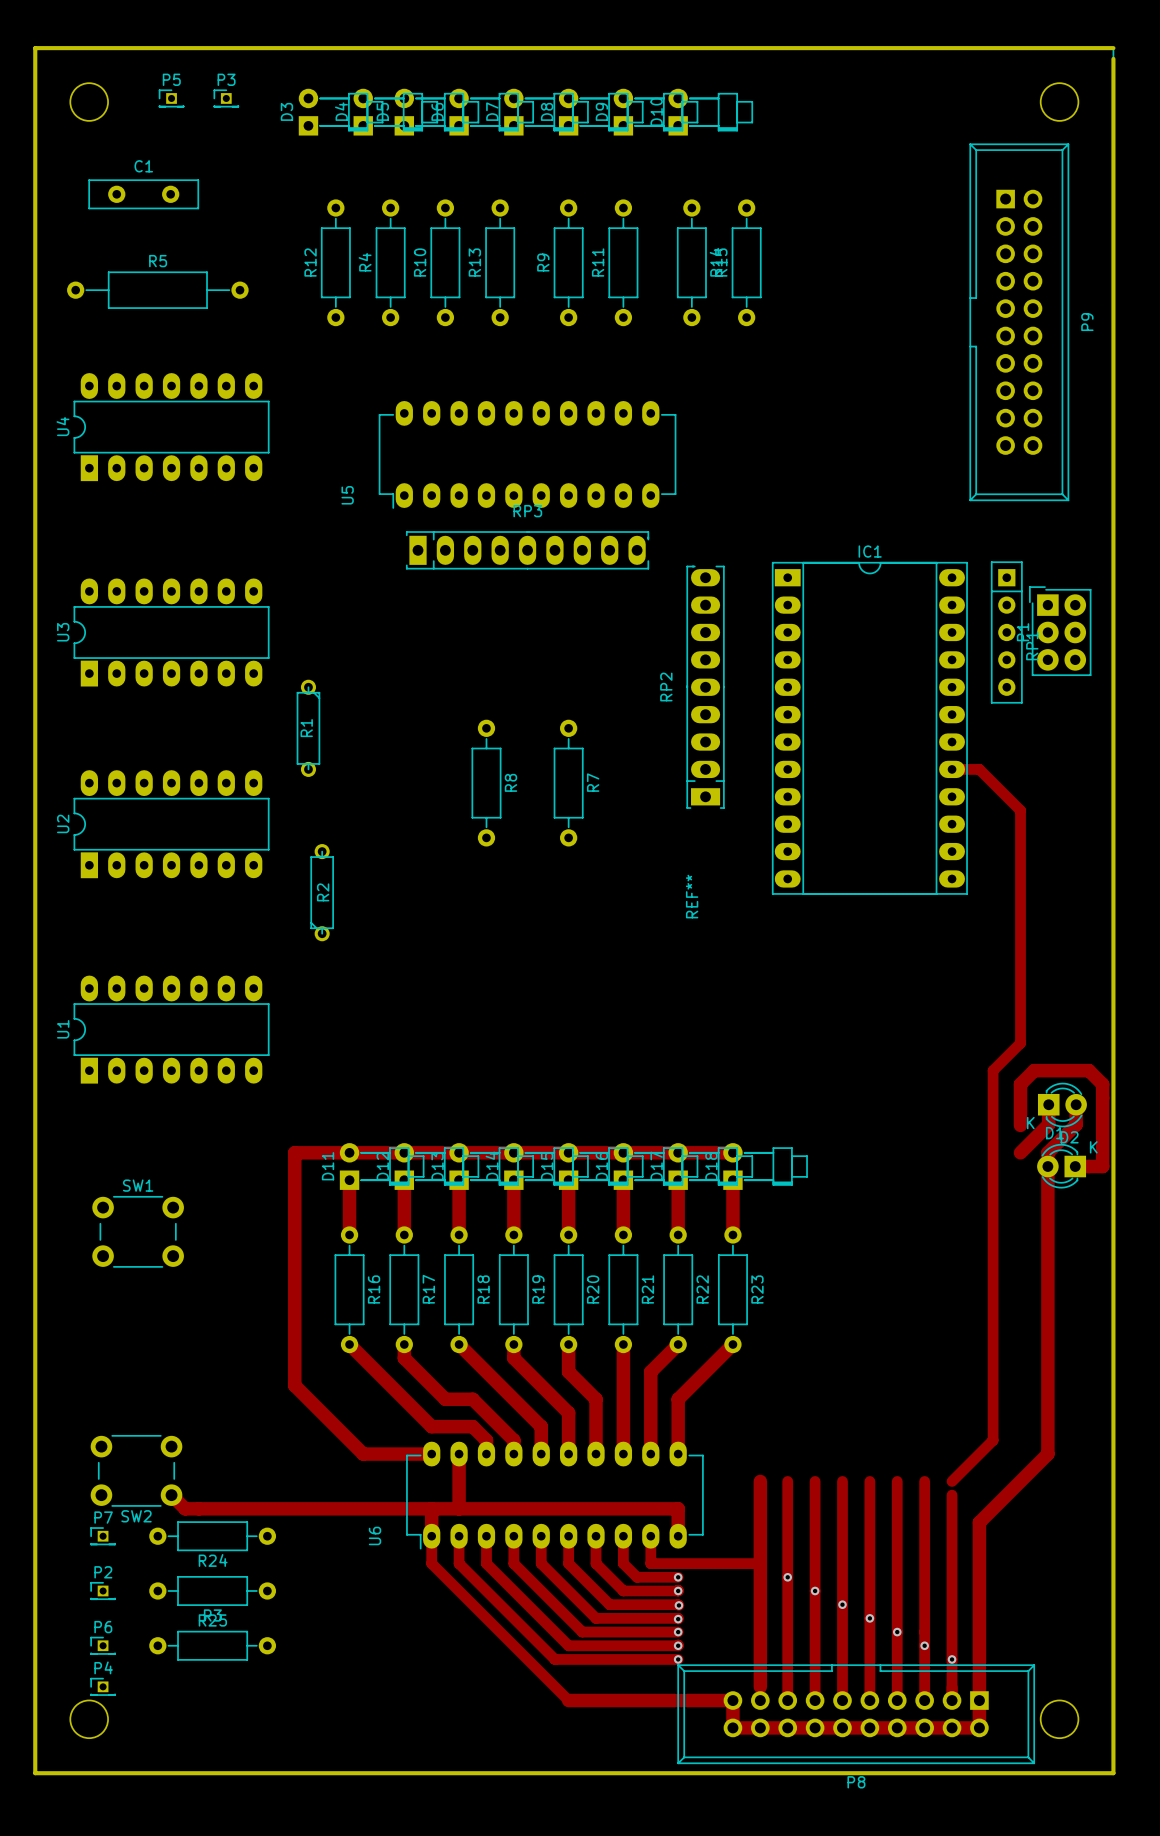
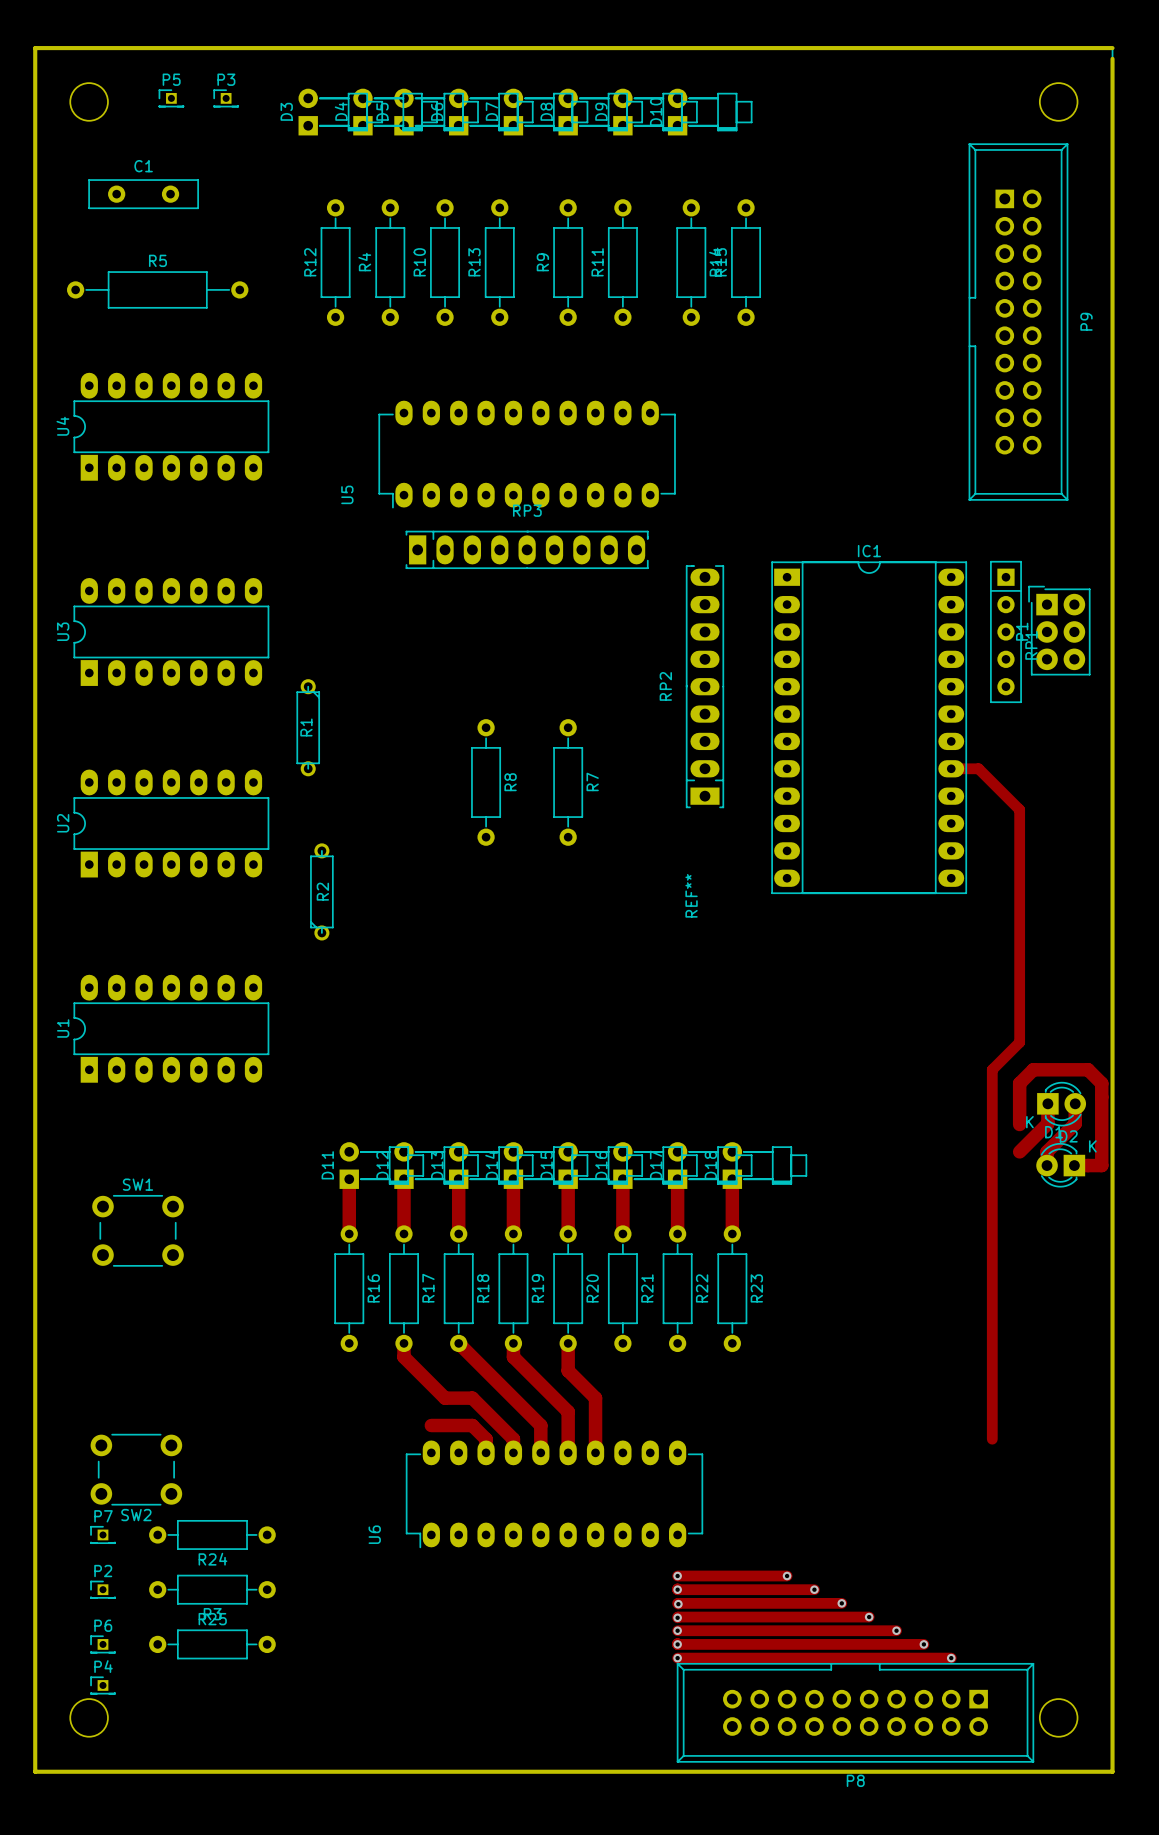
track: (732, 1152) (294, 1152) (294, 1385) (363, 1454) (431, 1454) -> none
track: (1047, 1166) (1047, 1454) (979, 1522) (979, 1727) (732, 1727) (732, 1700) (568, 1700) (431, 1563) (431, 1508) -> none
track: (349, 1344) (431, 1426) -> none
track: (623, 1344) (623, 1454) -> none
track: (678, 1344) (650, 1371) (650, 1454) -> none
track: (732, 1344) (678, 1399) (678, 1454) -> none
track: (993, 1440) (952, 1481) -> none
track: (459, 1454) (459, 1508) -> none
track: (760, 1481) (760, 1686) -> none
track: (787, 1481) (787, 1700) -> none
track: (815, 1481) (815, 1700) -> none
track: (842, 1481) (842, 1700) -> none
track: (869, 1481) (869, 1700) -> none
track: (897, 1481) (897, 1700) -> none
track: (924, 1481) (924, 1700) -> none
track: (171, 1495) (185, 1508) (678, 1508) (678, 1536) -> none
track: (952, 1495) (952, 1700) -> none
track: (459, 1536) (459, 1563) (554, 1659) (678, 1659) -> (951, 1658) (677, 1658)
track: (486, 1536) (486, 1563) (568, 1645) (678, 1645) -> (923, 1644) (677, 1644)
track: (513, 1536) (513, 1563) (582, 1632) (678, 1632) -> (896, 1630) (677, 1630)
track: (541, 1536) (541, 1563) (596, 1618) (678, 1618) -> none
track: (568, 1536) (568, 1563) (609, 1604) (678, 1604) -> none
track: (596, 1536) (596, 1563) (623, 1590) (678, 1590) -> (814, 1589) (677, 1589)
track: (623, 1536) (623, 1563) (637, 1577) (678, 1577) -> (787, 1576) (677, 1576)
track: (650, 1536) (650, 1563) (760, 1563) -> none
track: none -> (679, 1603) (841, 1603)
track: none -> (678, 1617) (869, 1617)

